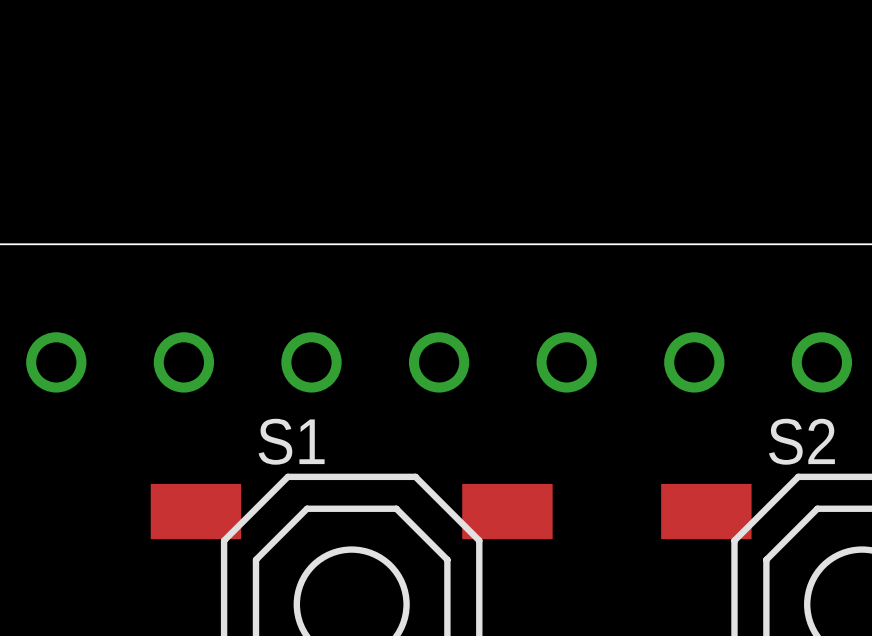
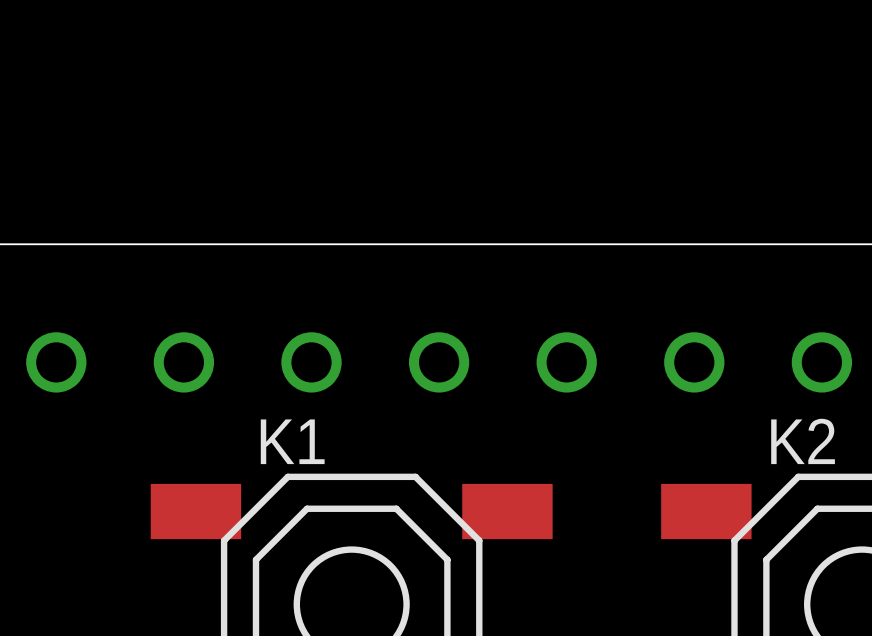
S1 name: S1 (291, 441) -> K1 (292, 441)
S2 name: S2 (801, 441) -> K2 (803, 441)

